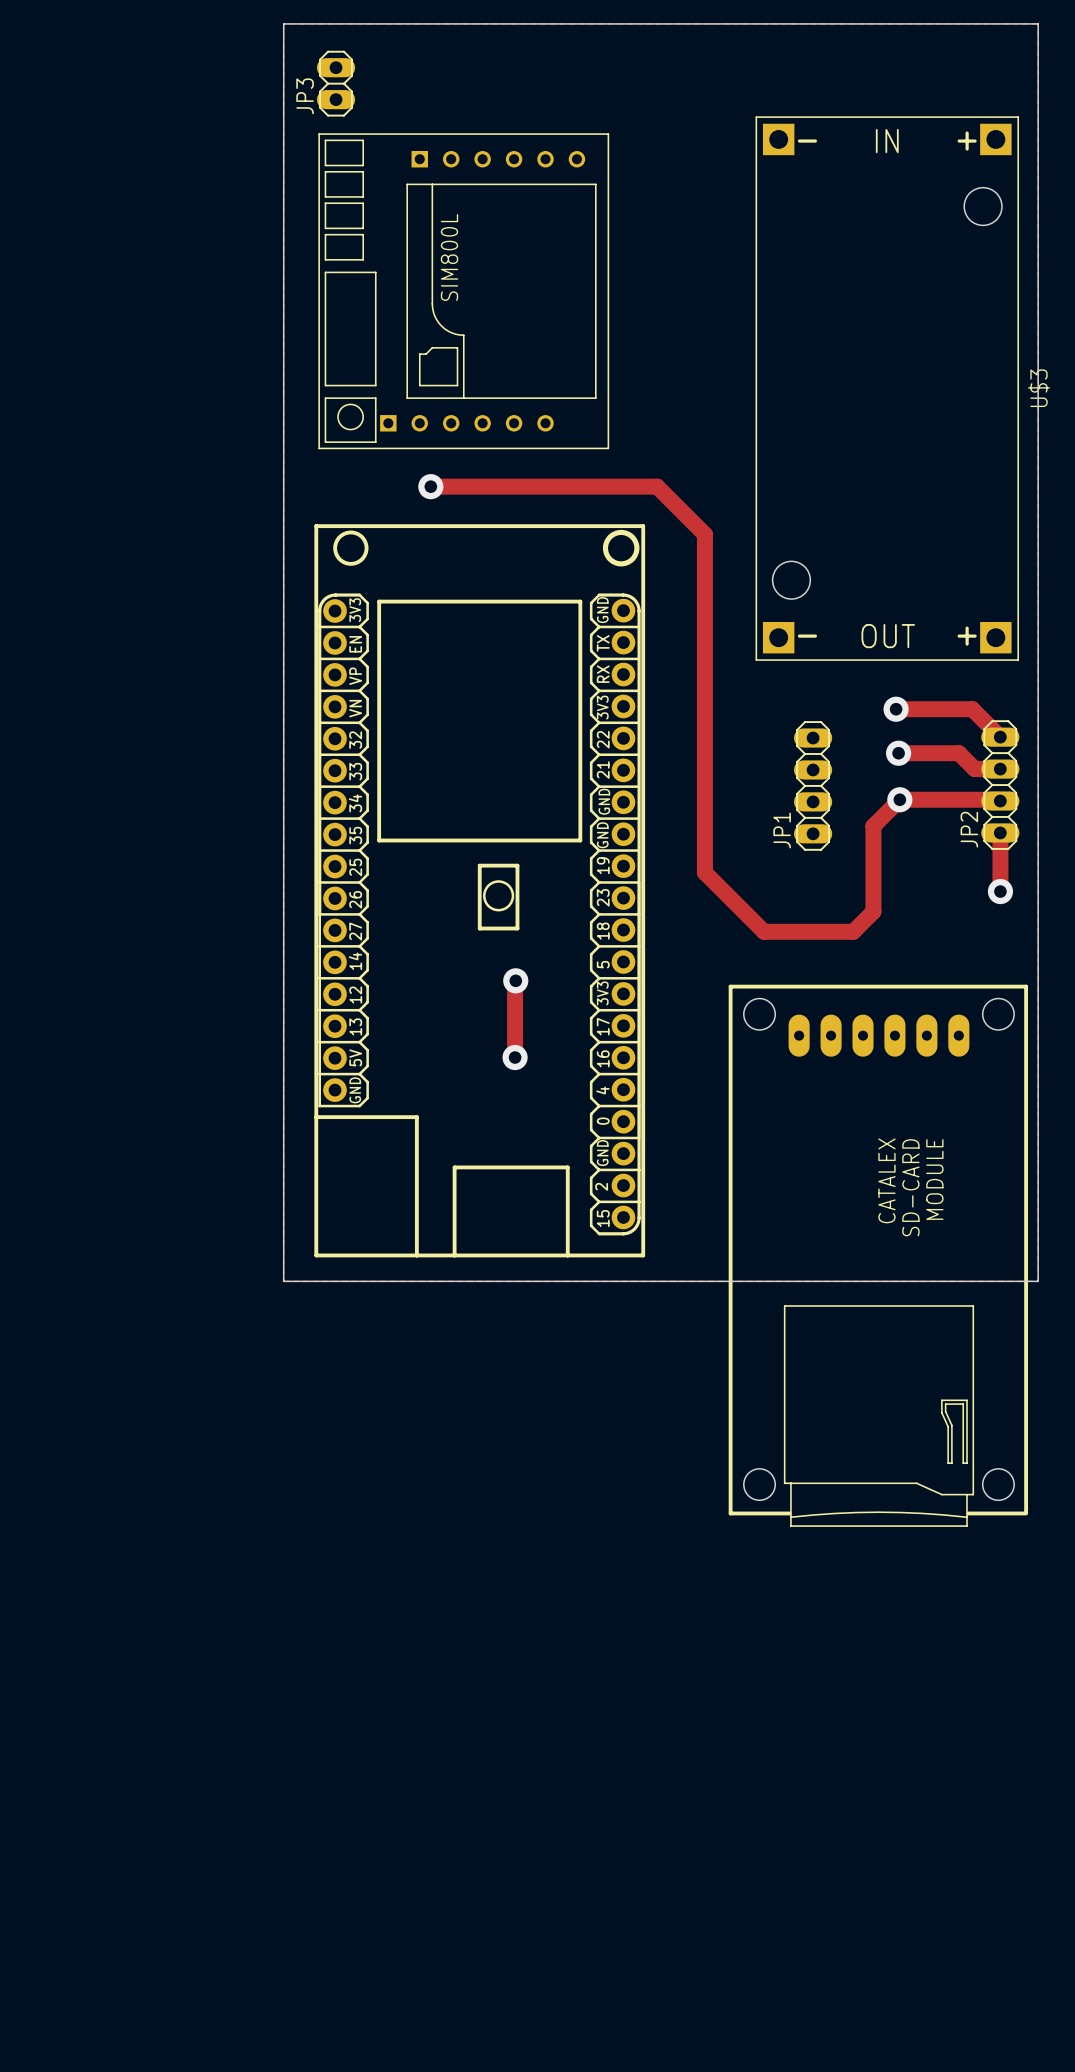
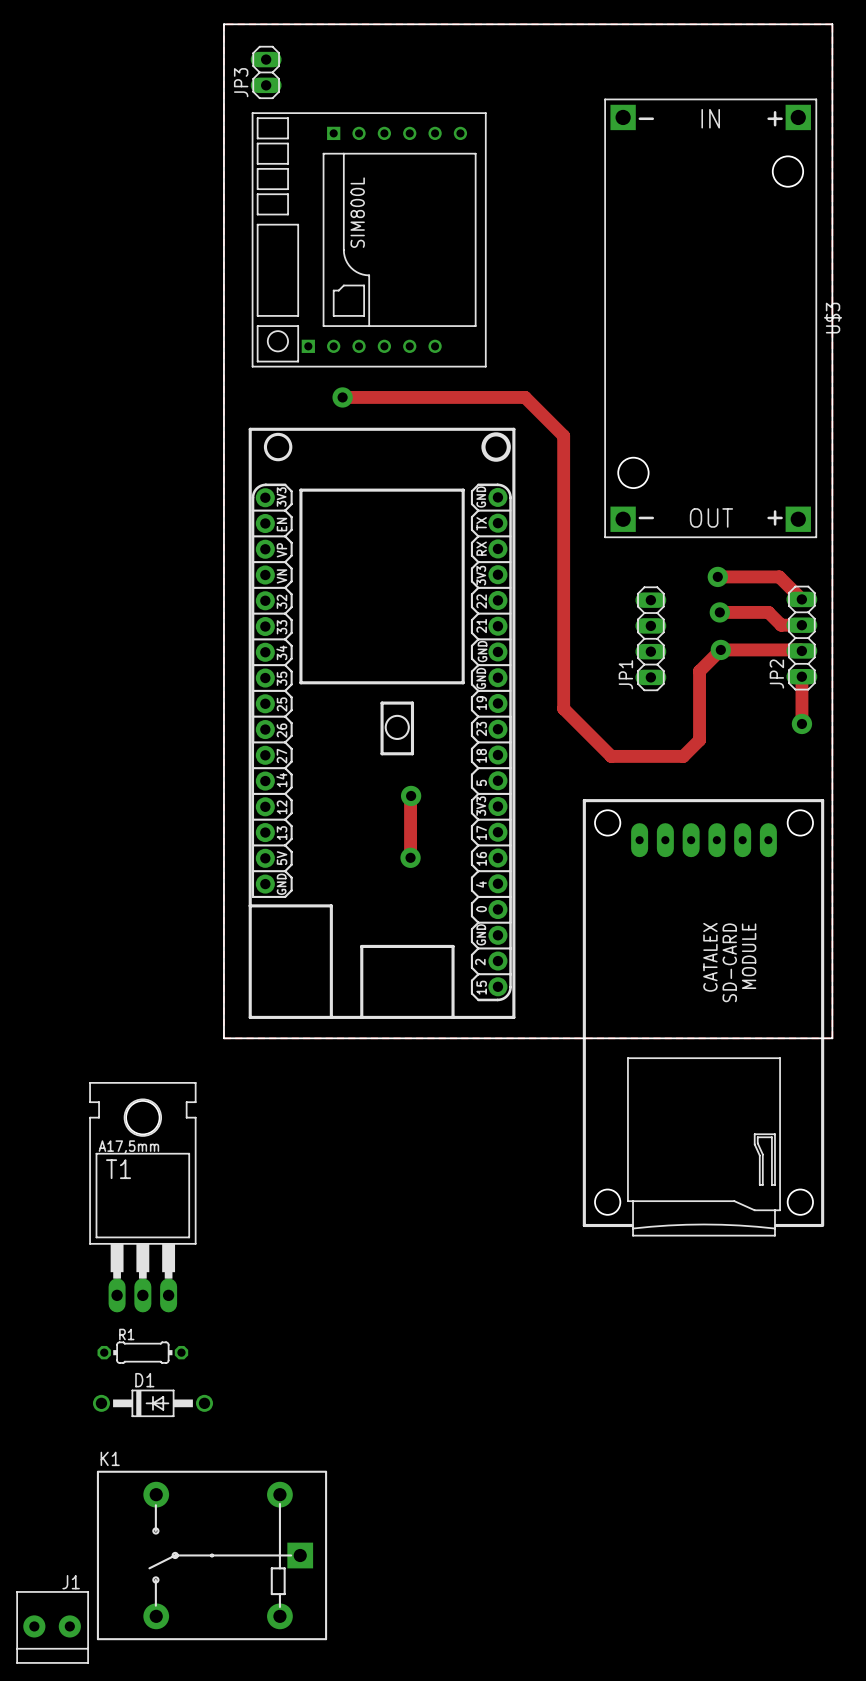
T1: none -> (142, 1197)
R1: none -> (142, 1352)
D1: none -> (152, 1403)
K1: none -> (212, 1555)
J1: none -> (52, 1627)

